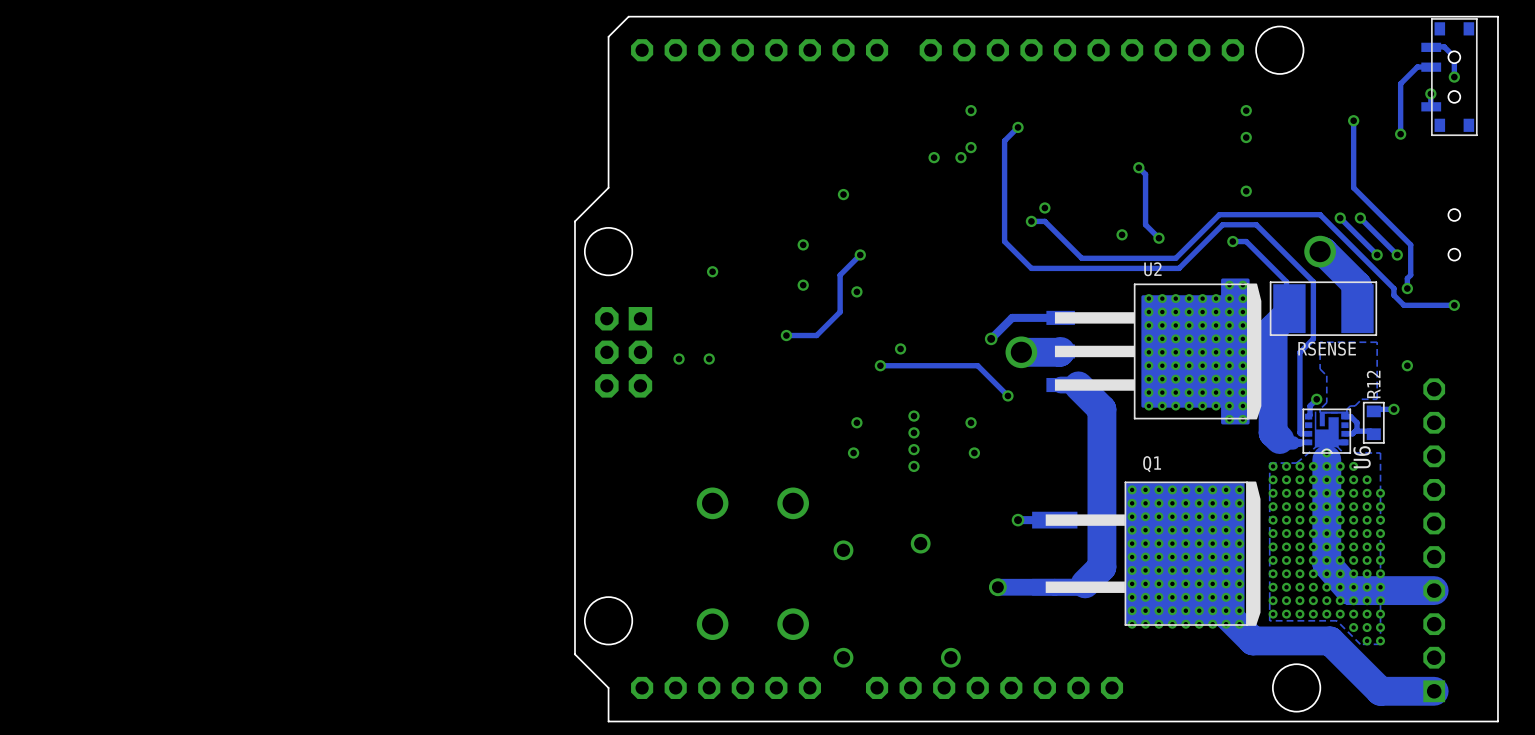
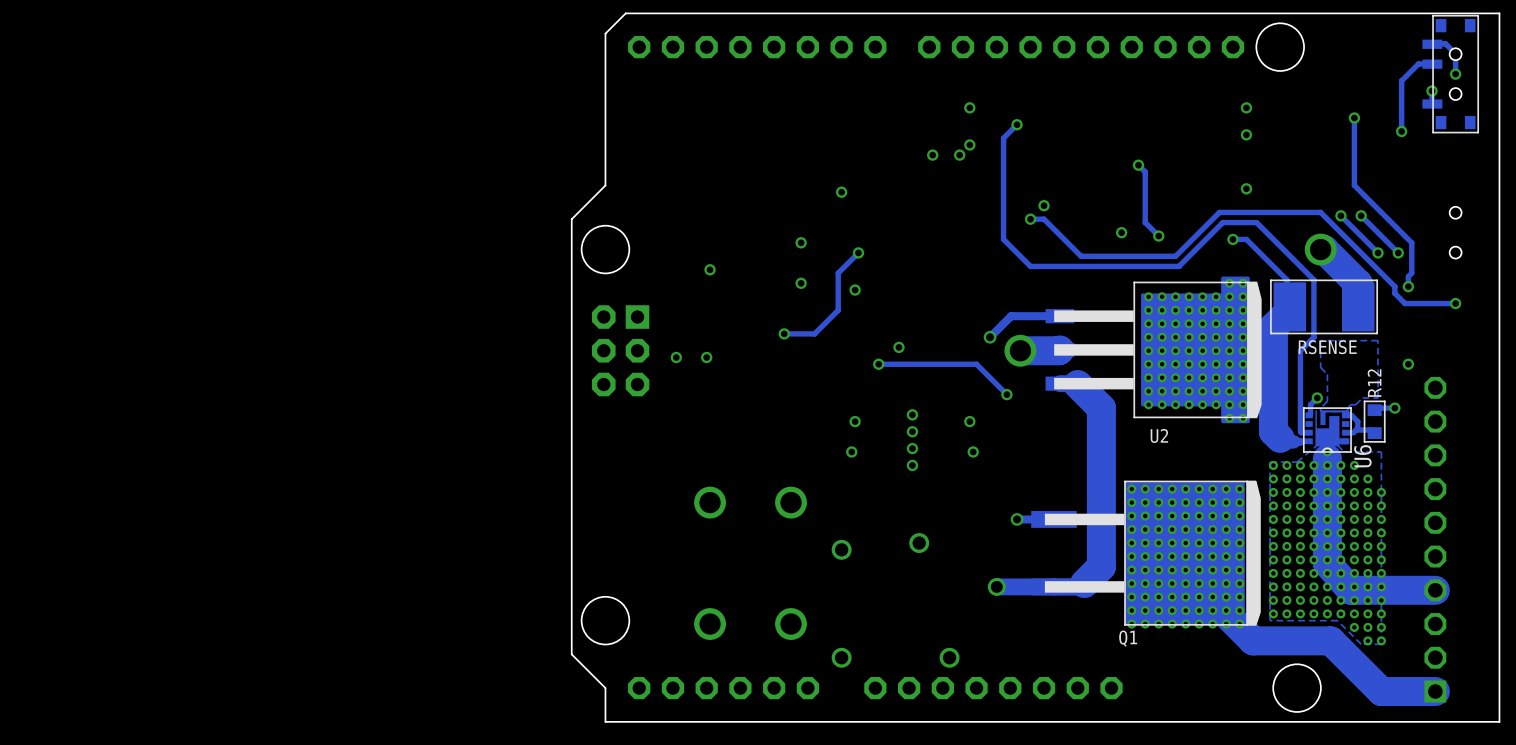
U2 name position: U2 (1152, 269) -> U2 (1159, 435)
Q1 name position: Q1 (1152, 464) -> Q1 (1128, 638)

